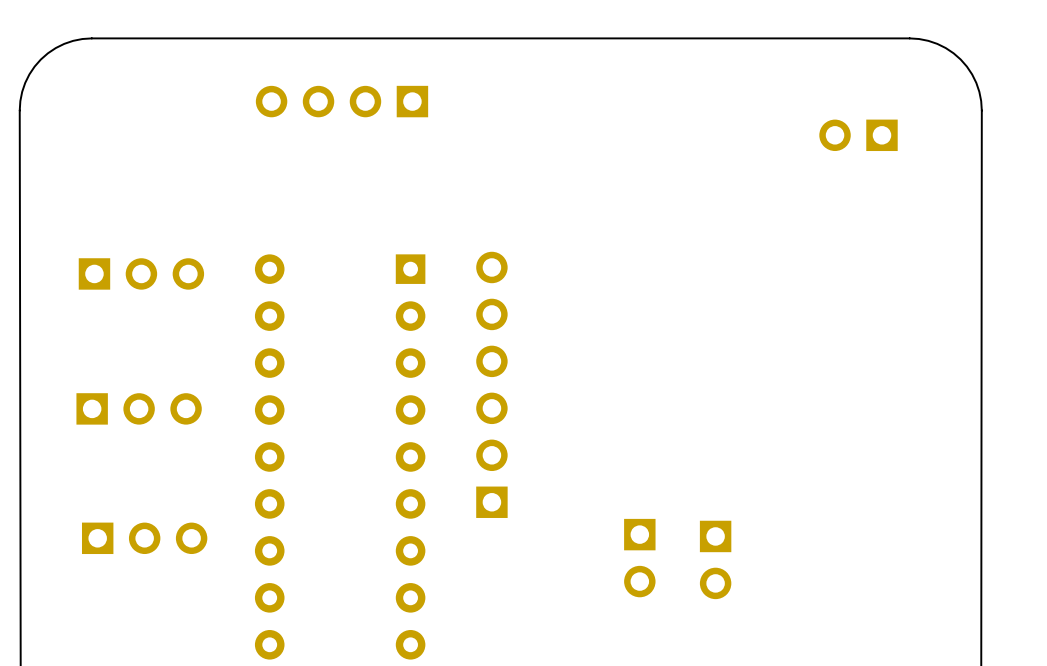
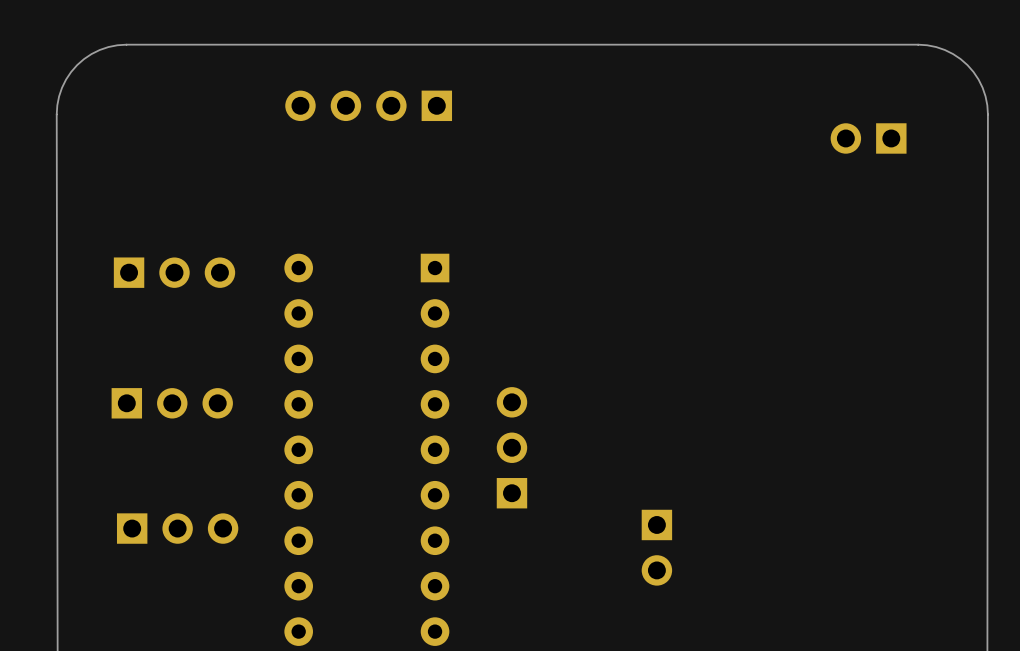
part: (491, 384) -> none
part: none -> (511, 447)
part: (715, 559) -> none

